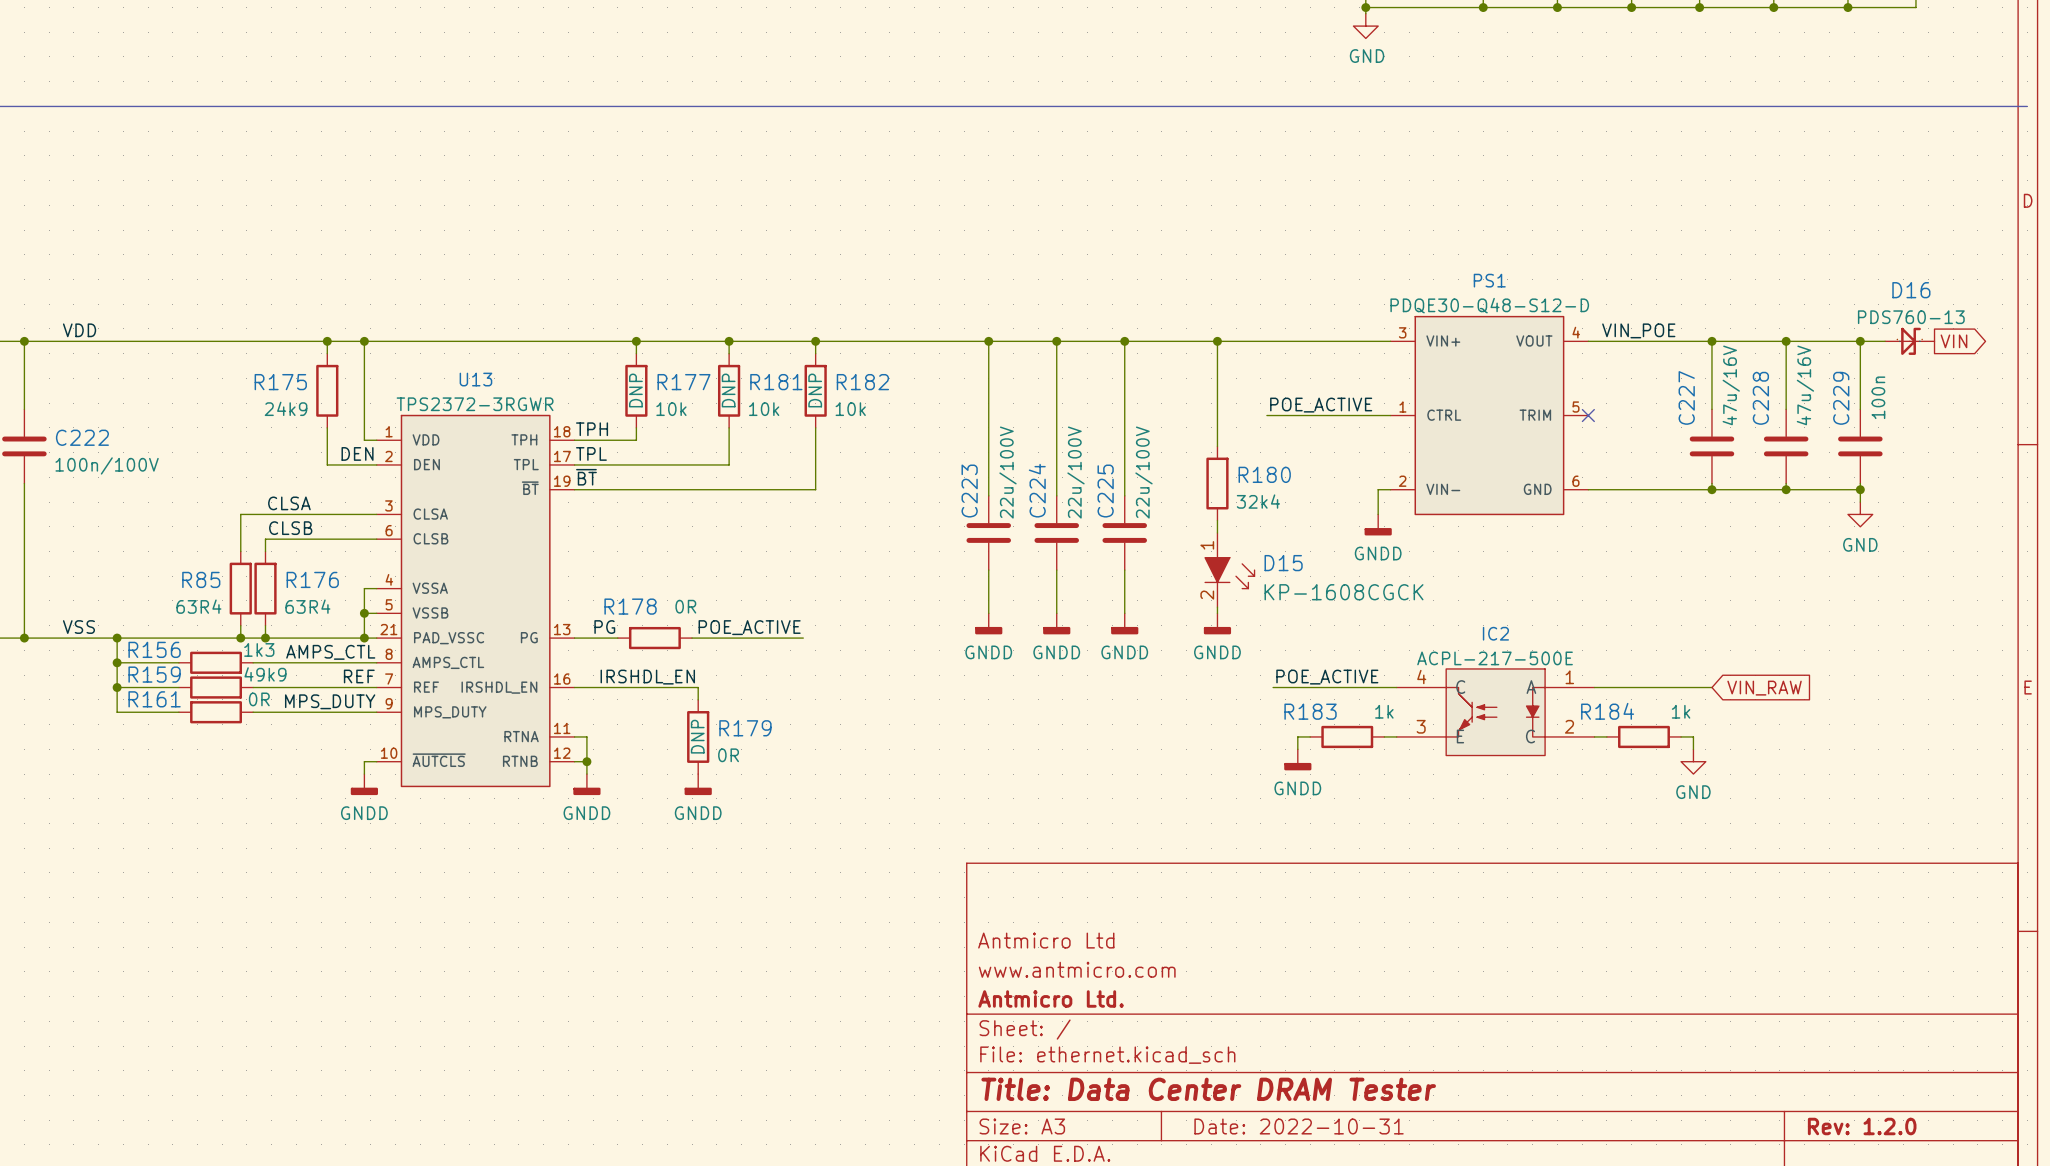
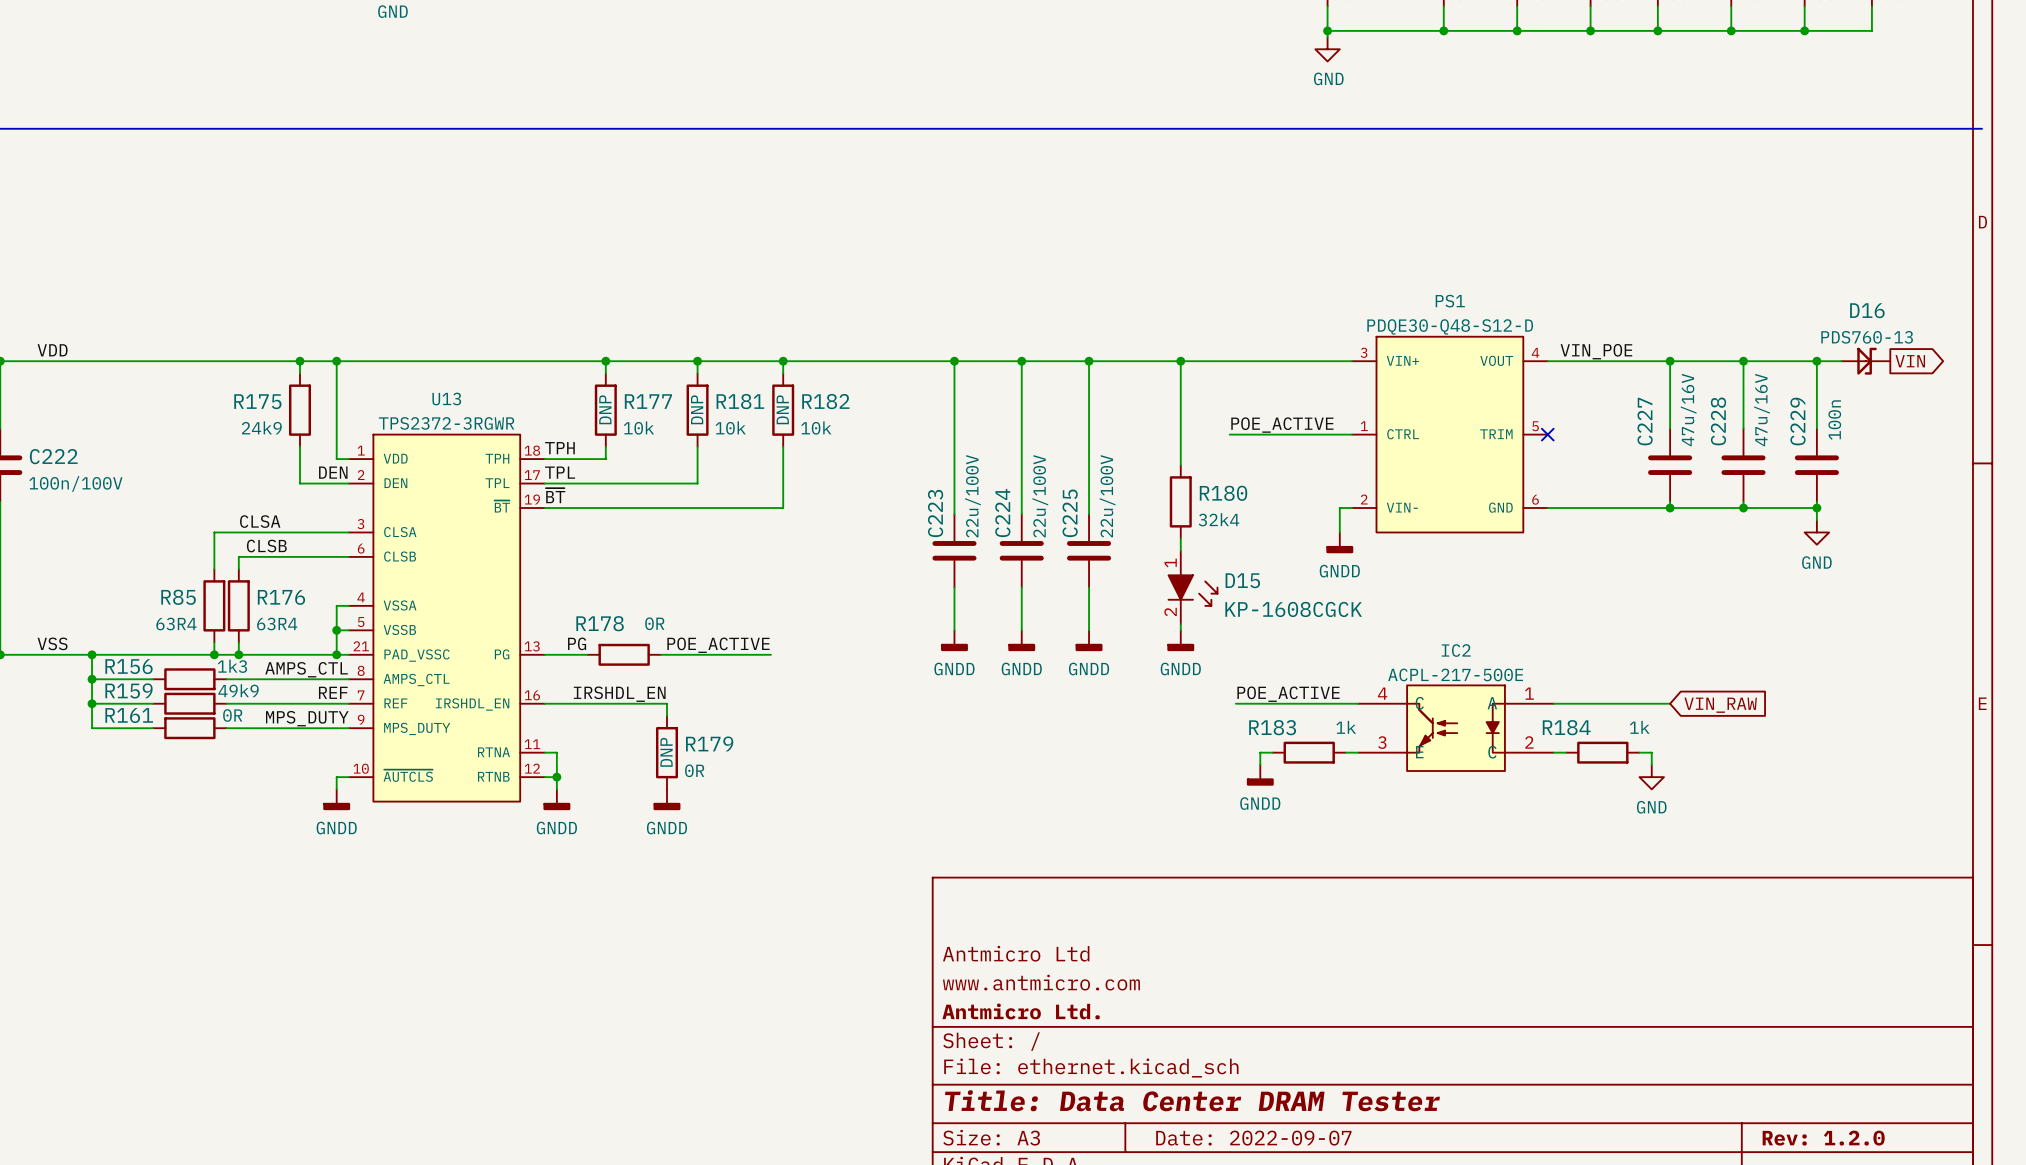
title block: Date: 2022-10-31 (1299, 1126) -> Date: 2022-09-07 (1253, 1138)

